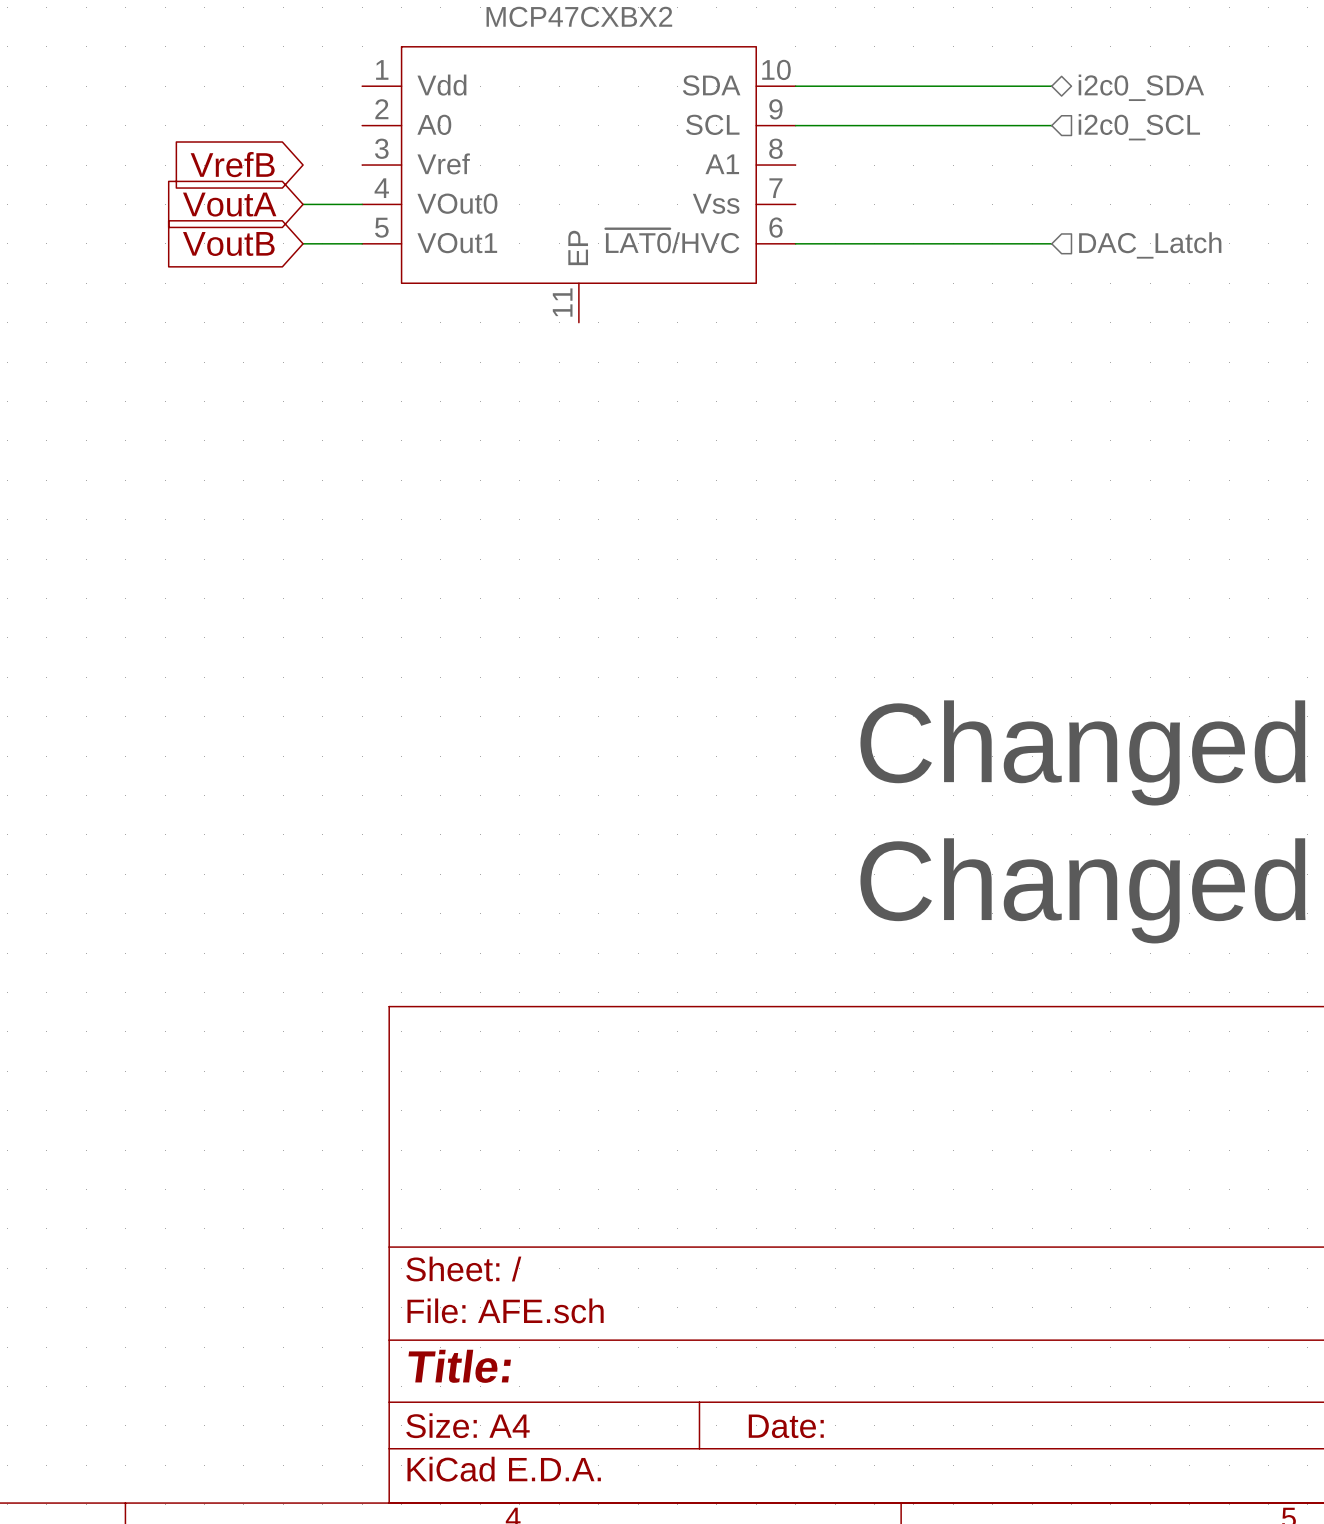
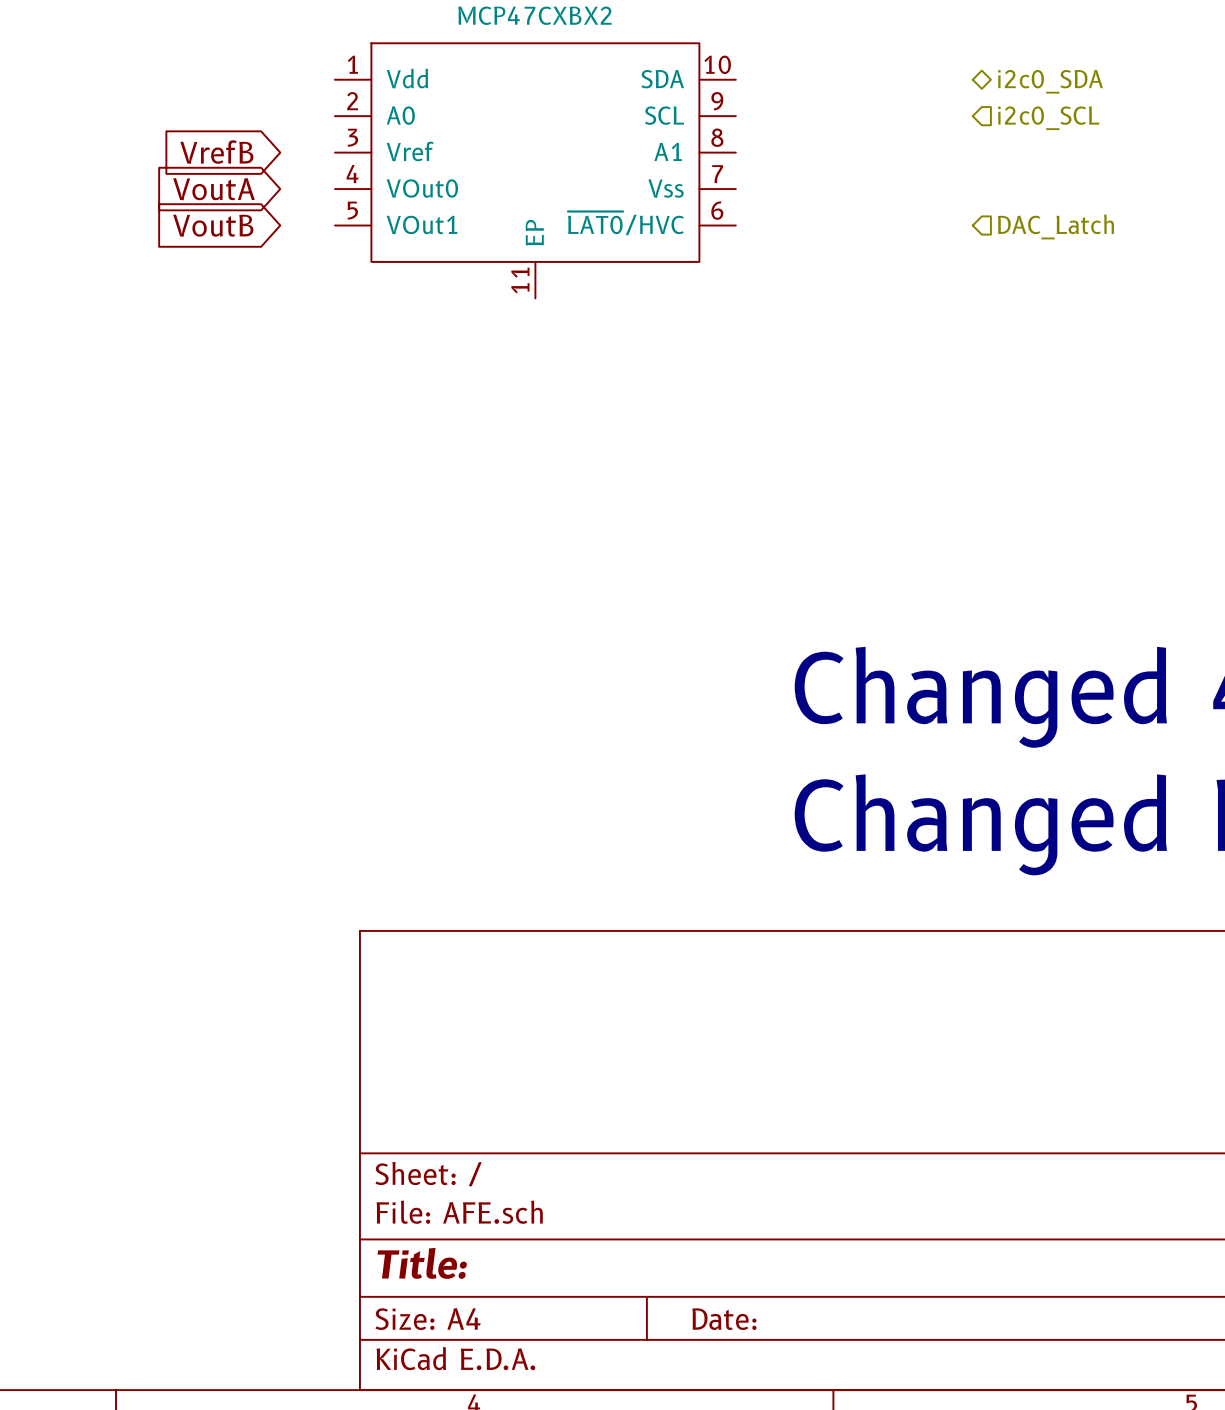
wire: (795, 86) (1051, 86) -> none
wire: (795, 125) (1051, 125) -> none
wire: (303, 204) (362, 204) -> none
wire: (303, 243) (362, 243) -> none
wire: (795, 243) (1051, 243) -> none

